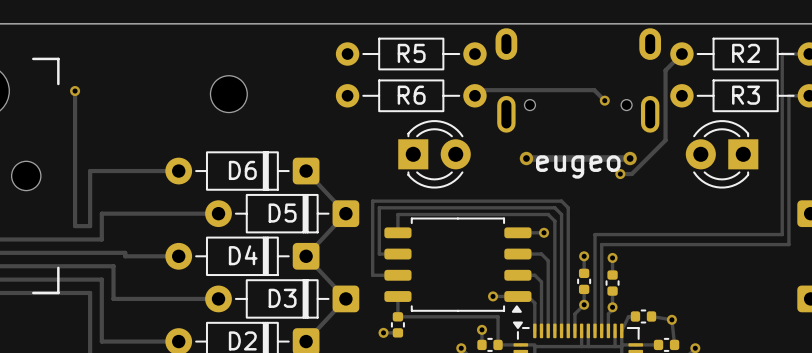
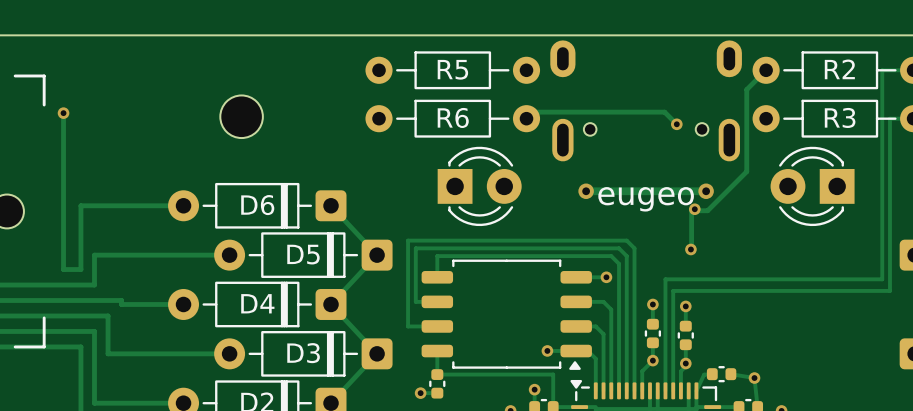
track: (665, 70) (665, 140) (631, 174) (620, 174) -> (747, 89) (746, 171) (707, 210) (691, 210) (690, 249)
via: none -> (690, 249)

